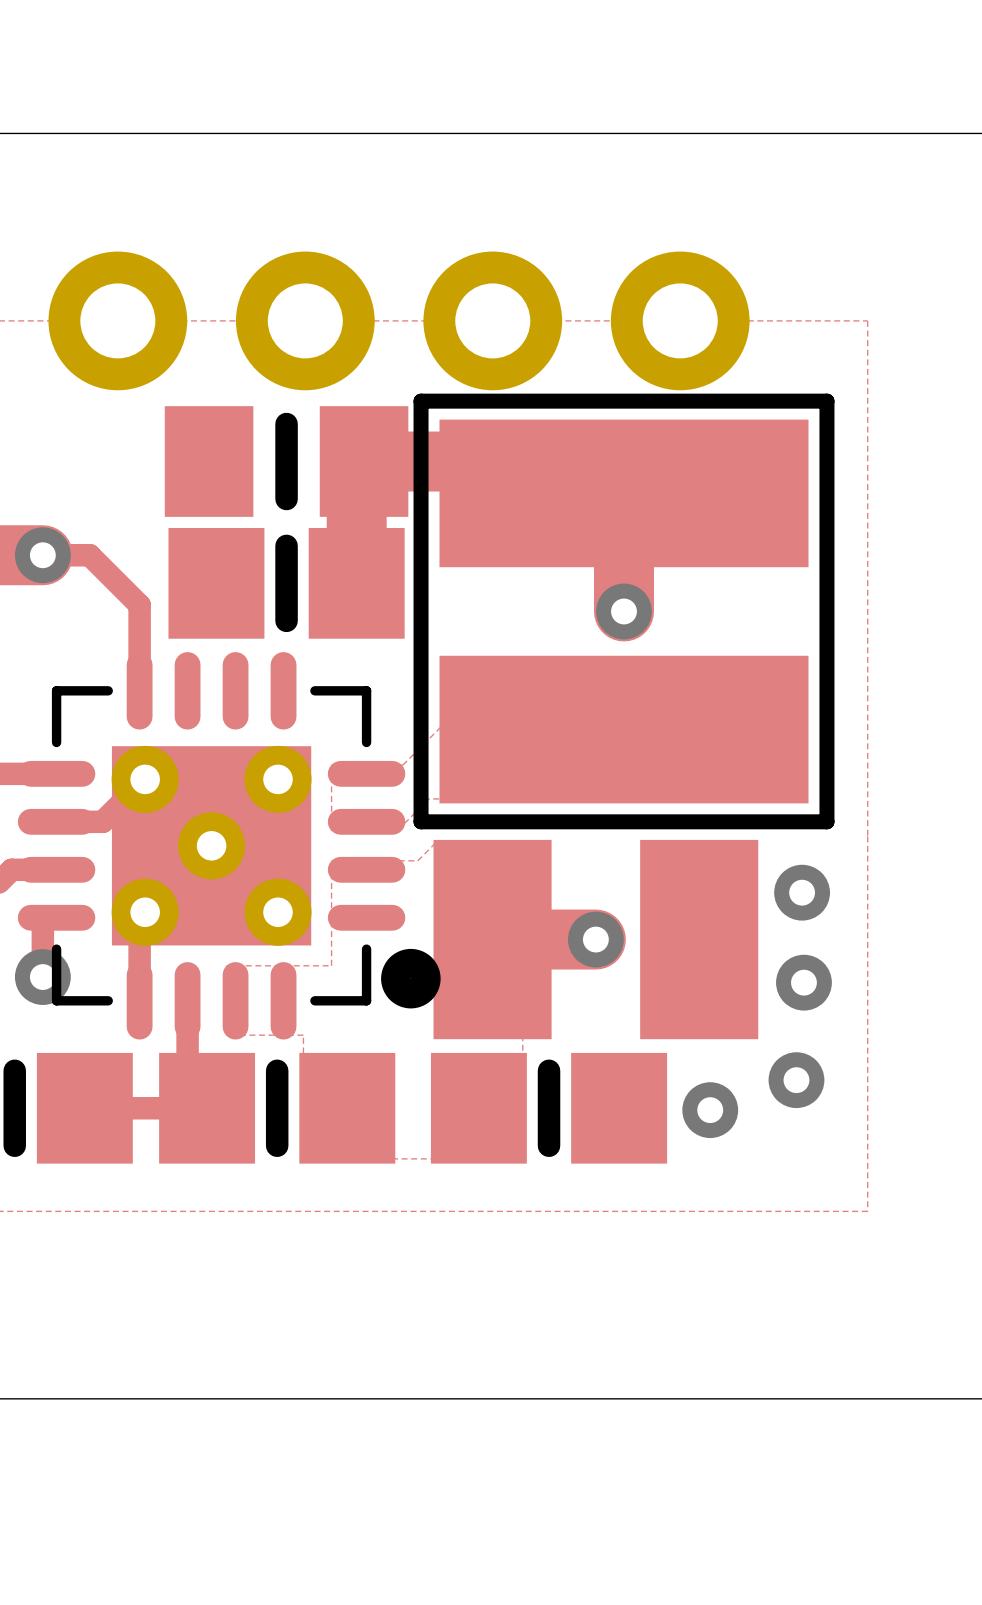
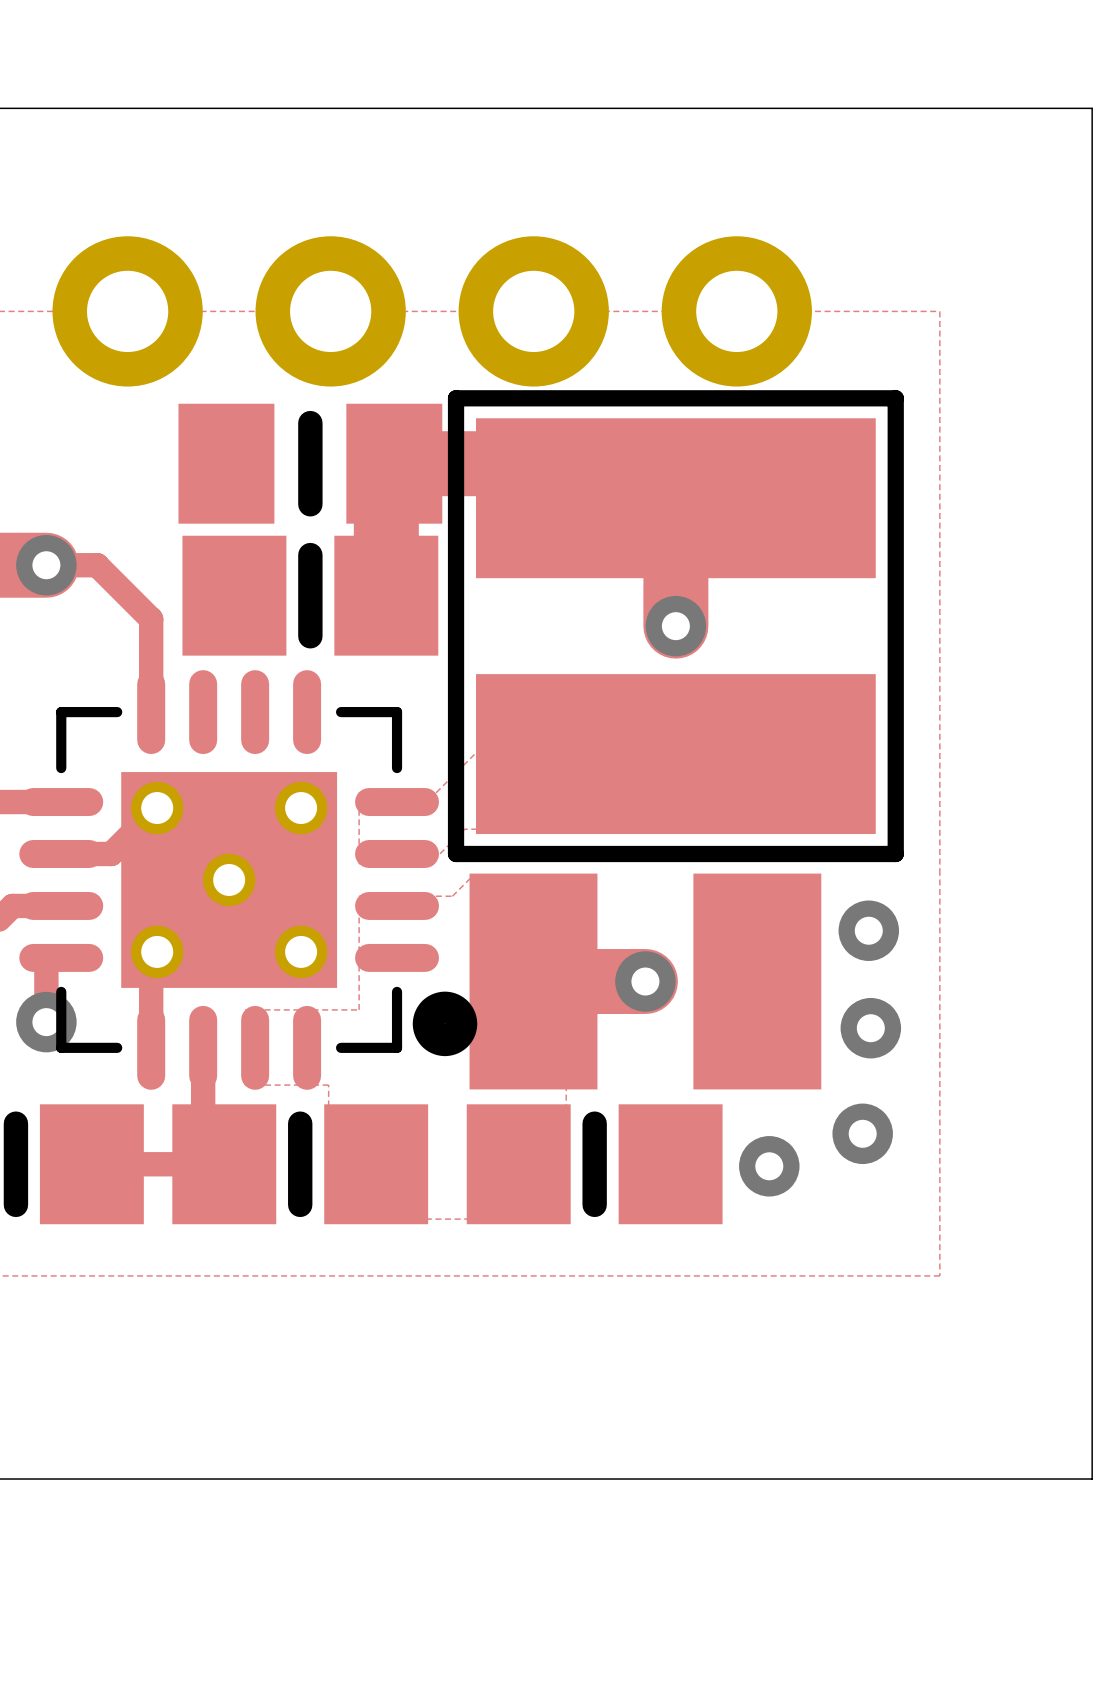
part footprint: [17, 652, 441, 1040] -> [19, 670, 478, 1090]

